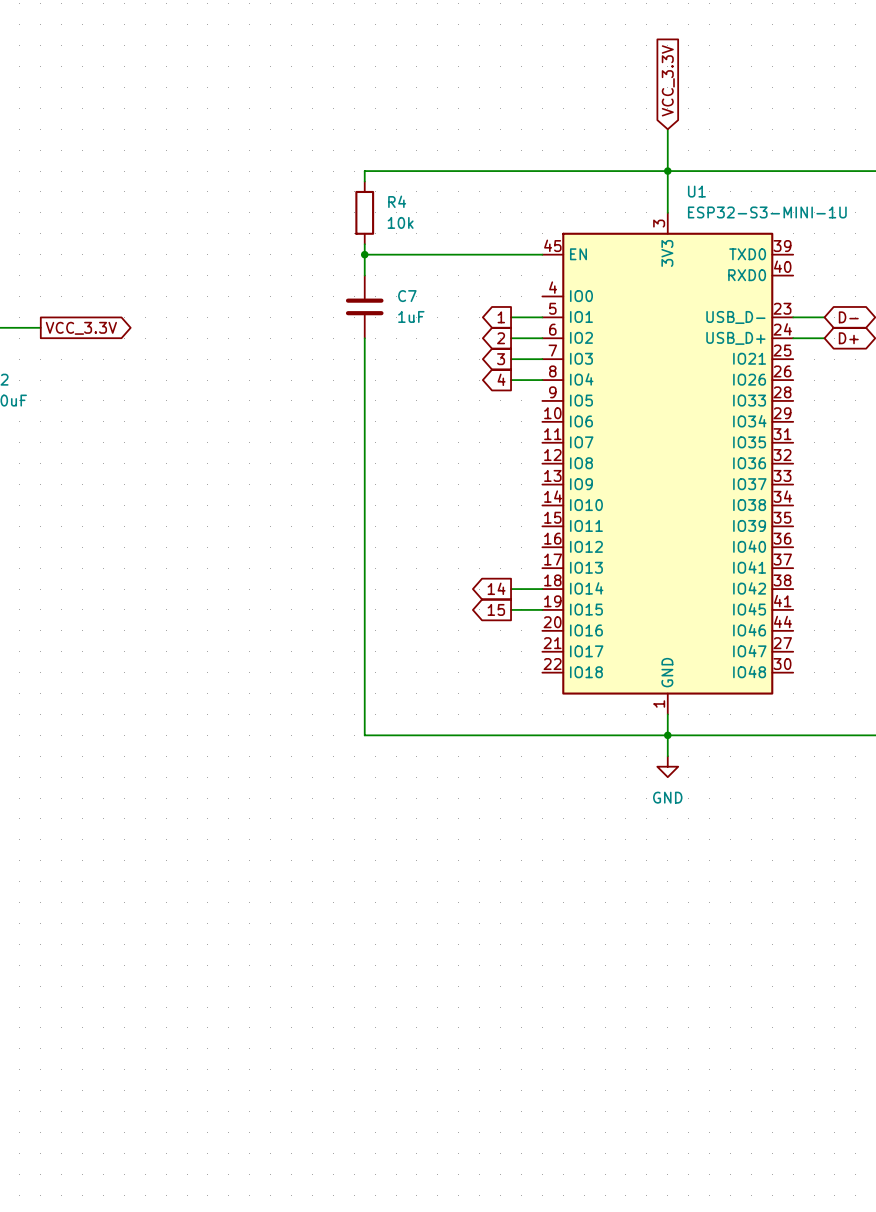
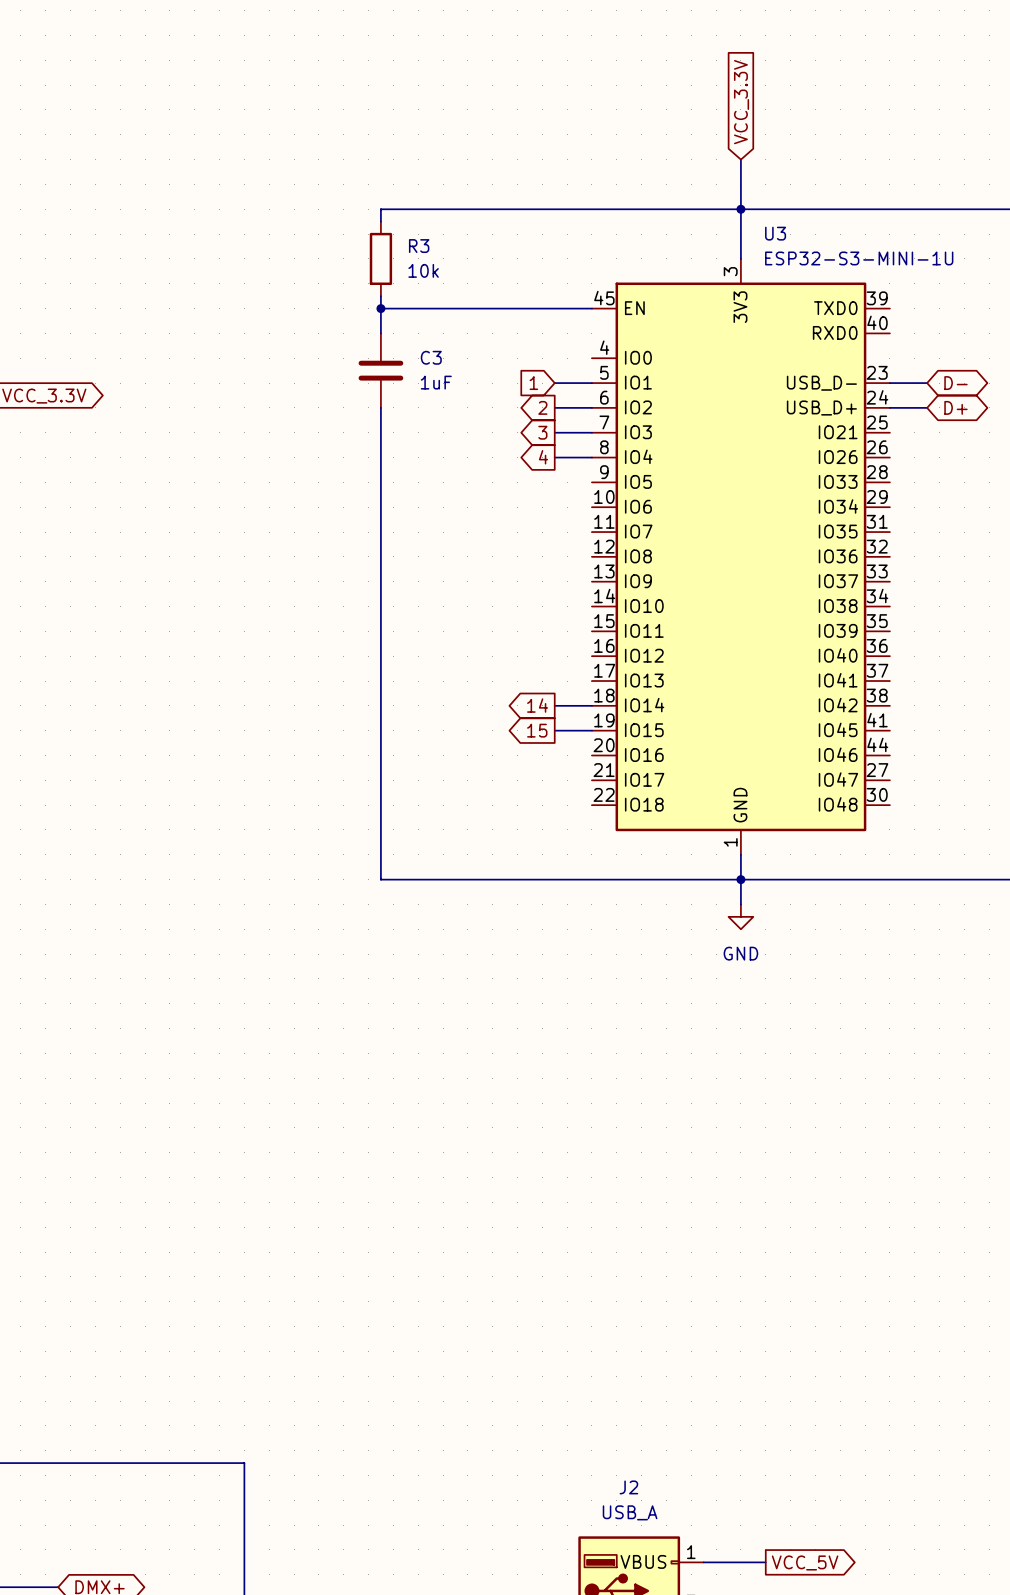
U1 name: U1 (696, 191) -> U3 (775, 233)
R4 name: R4 (397, 201) -> R3 (419, 246)
C7 name: C7 (407, 296) -> C3 (431, 357)
global label shape: output (501, 317) -> input (533, 383)

